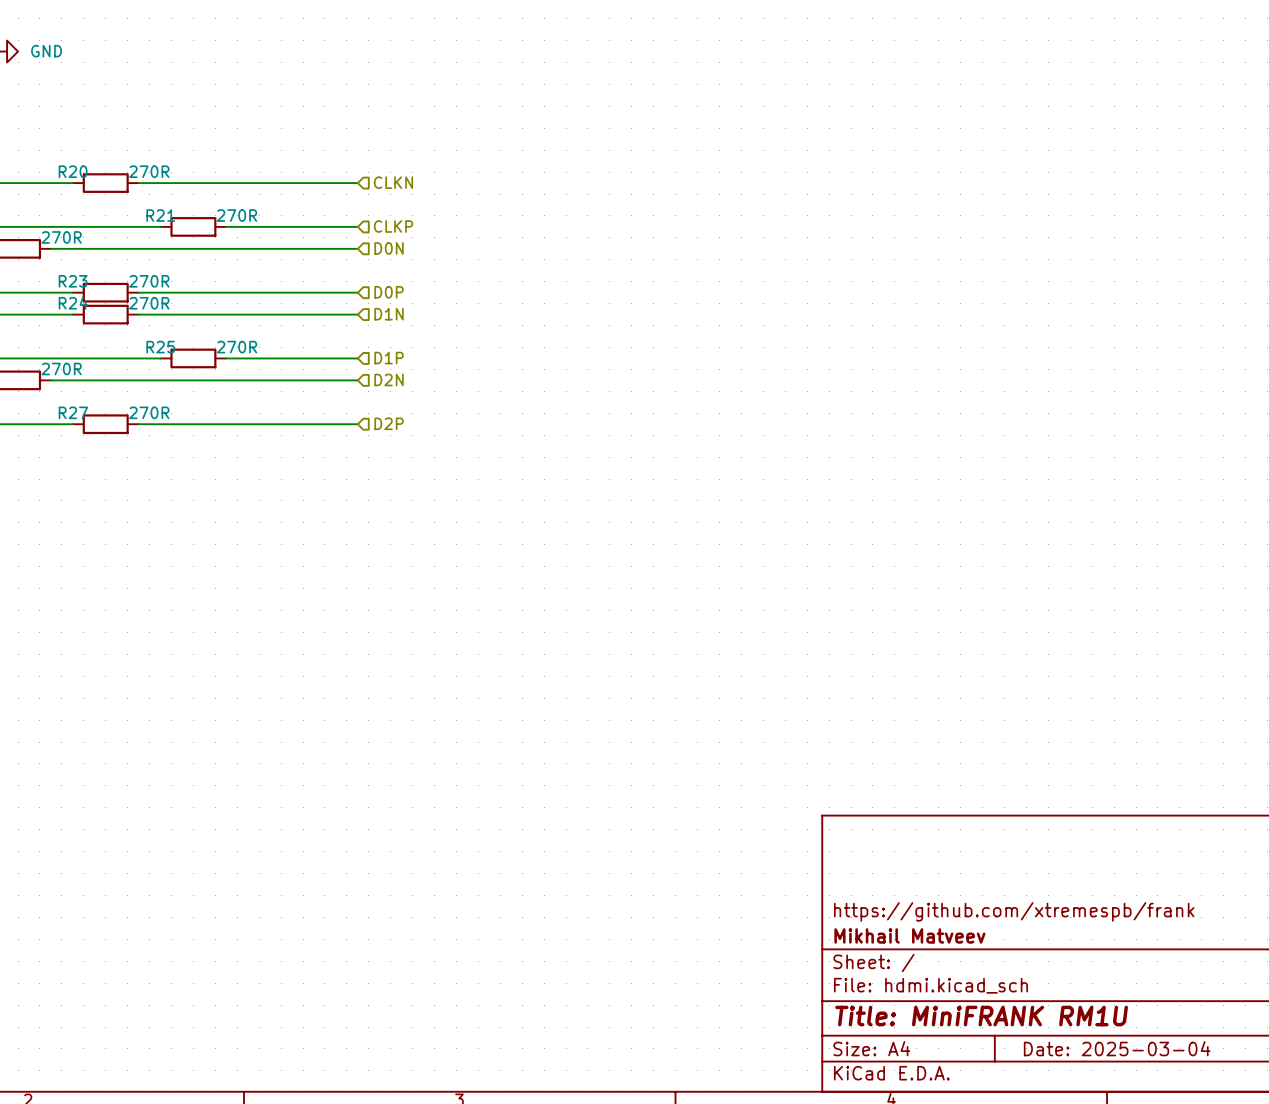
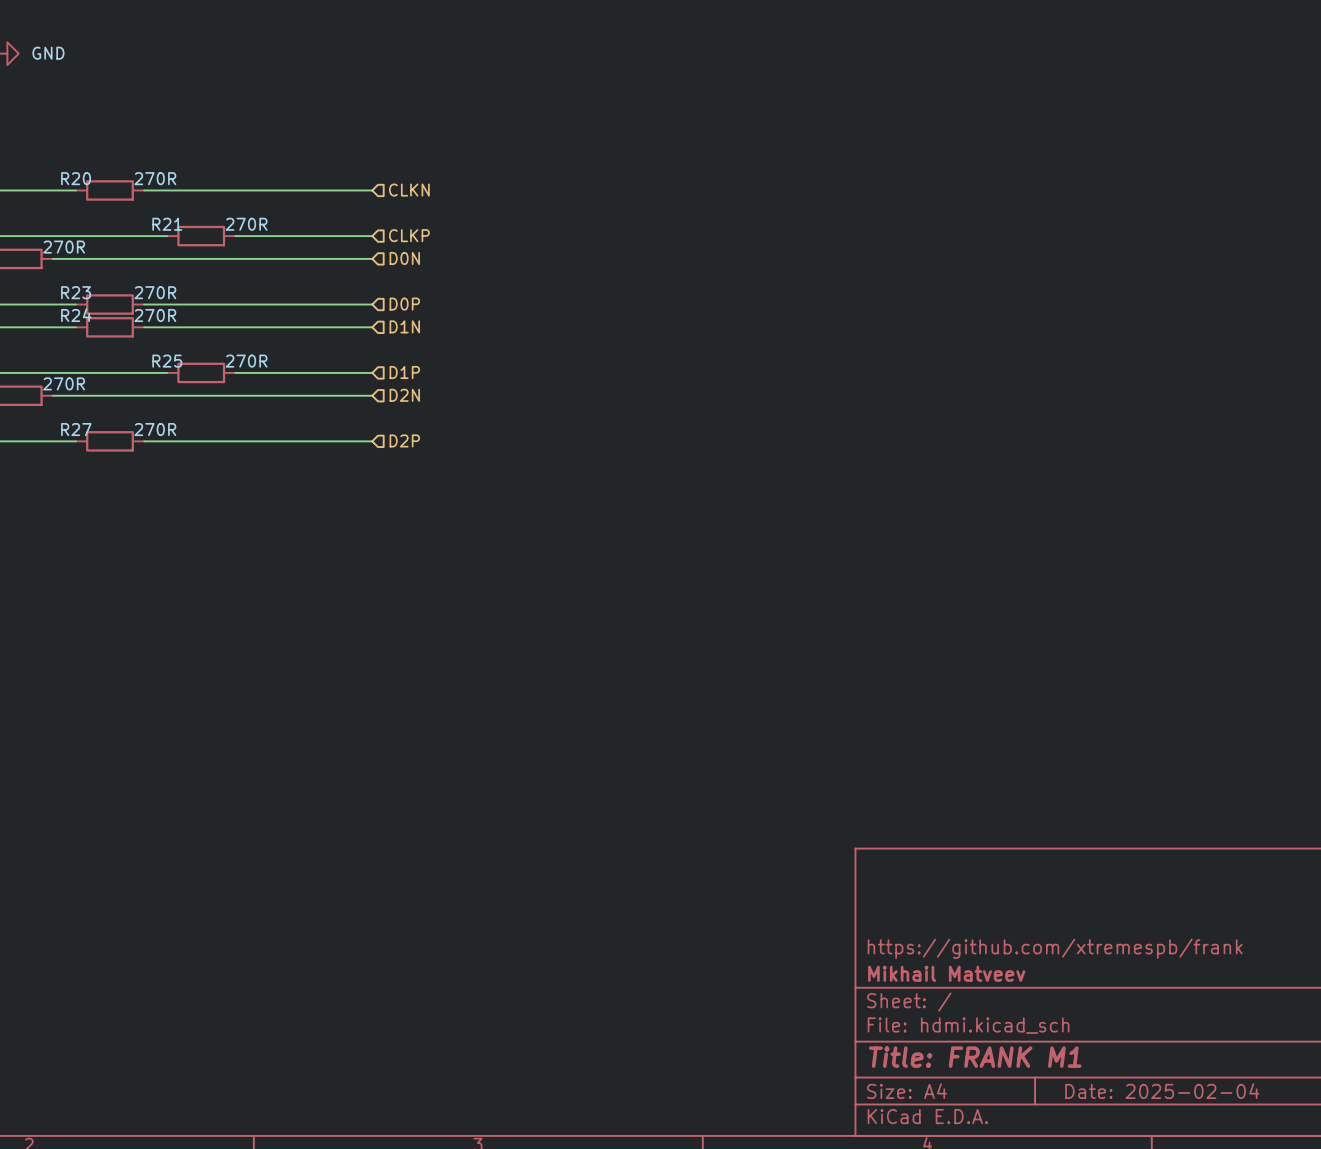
title block: Title: MiniFRANK RM1U (981, 1016) -> Title: FRANK M1 (975, 1057)
title block: Date: 2025-03-04 (1117, 1048) -> Date: 2025-02-04 (1162, 1091)

